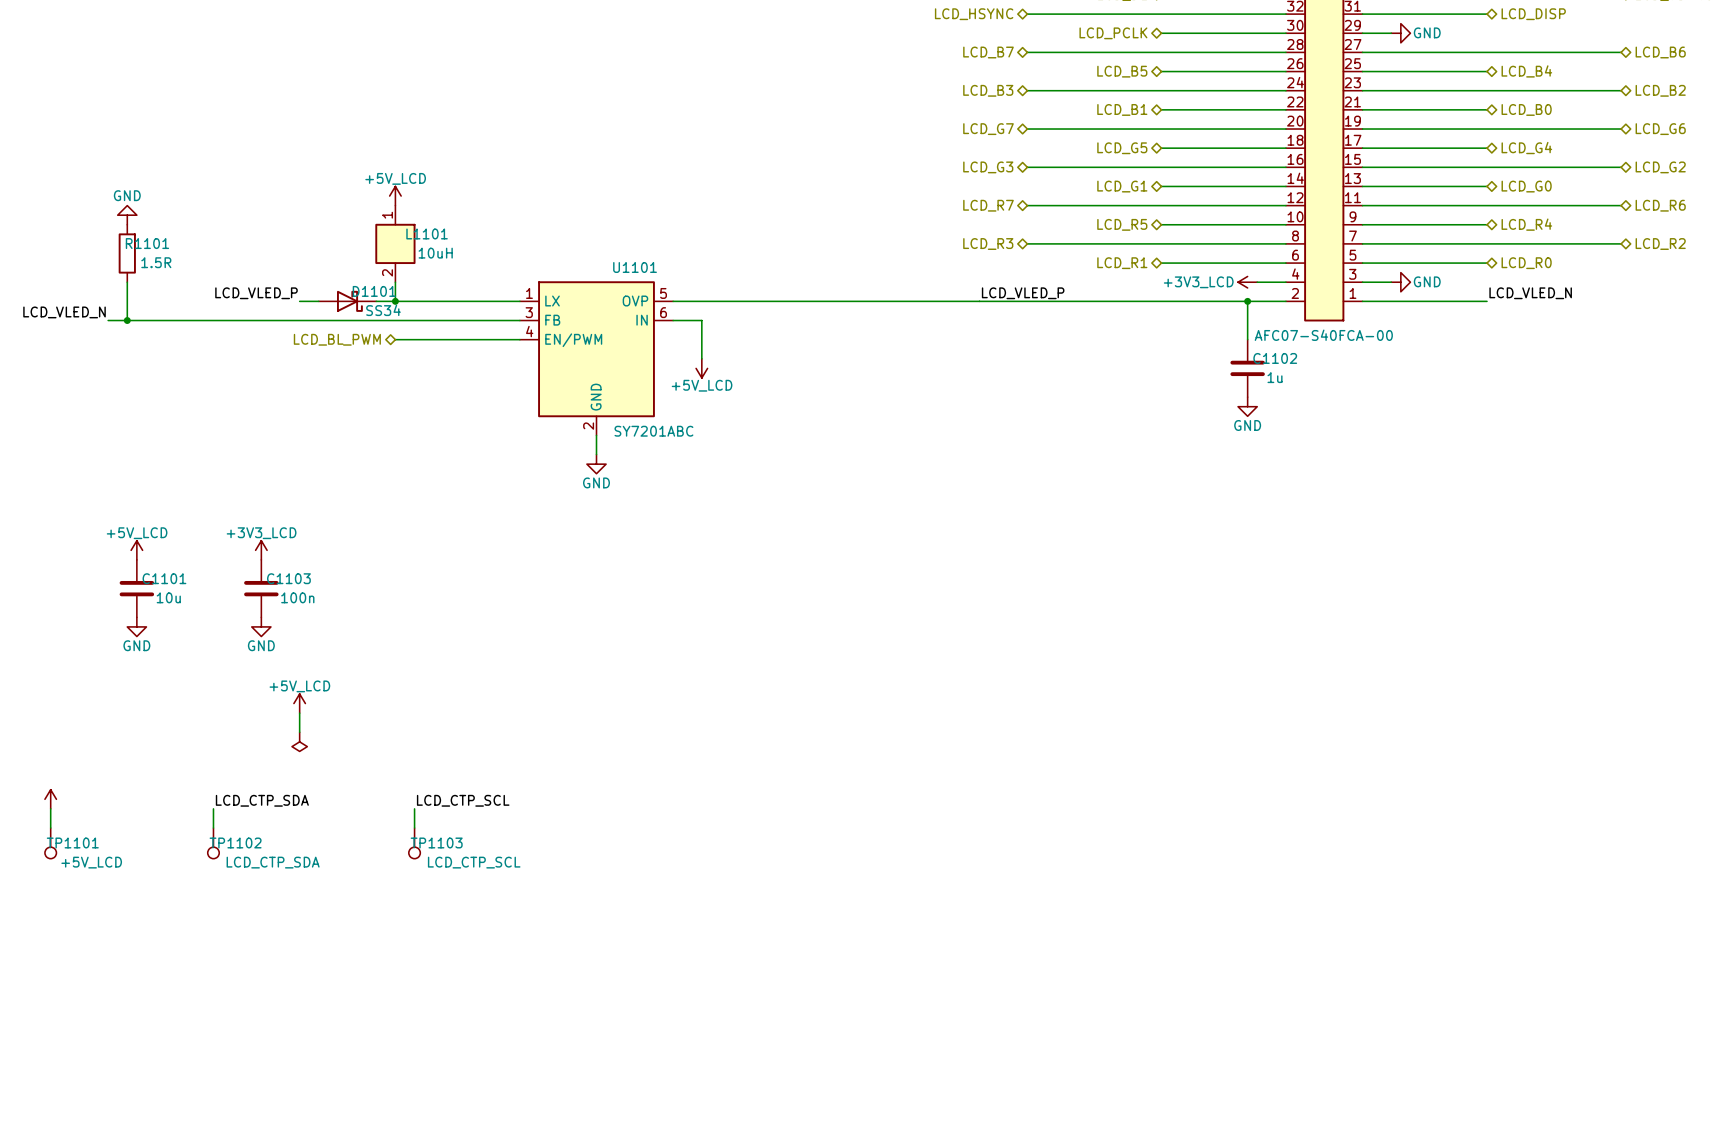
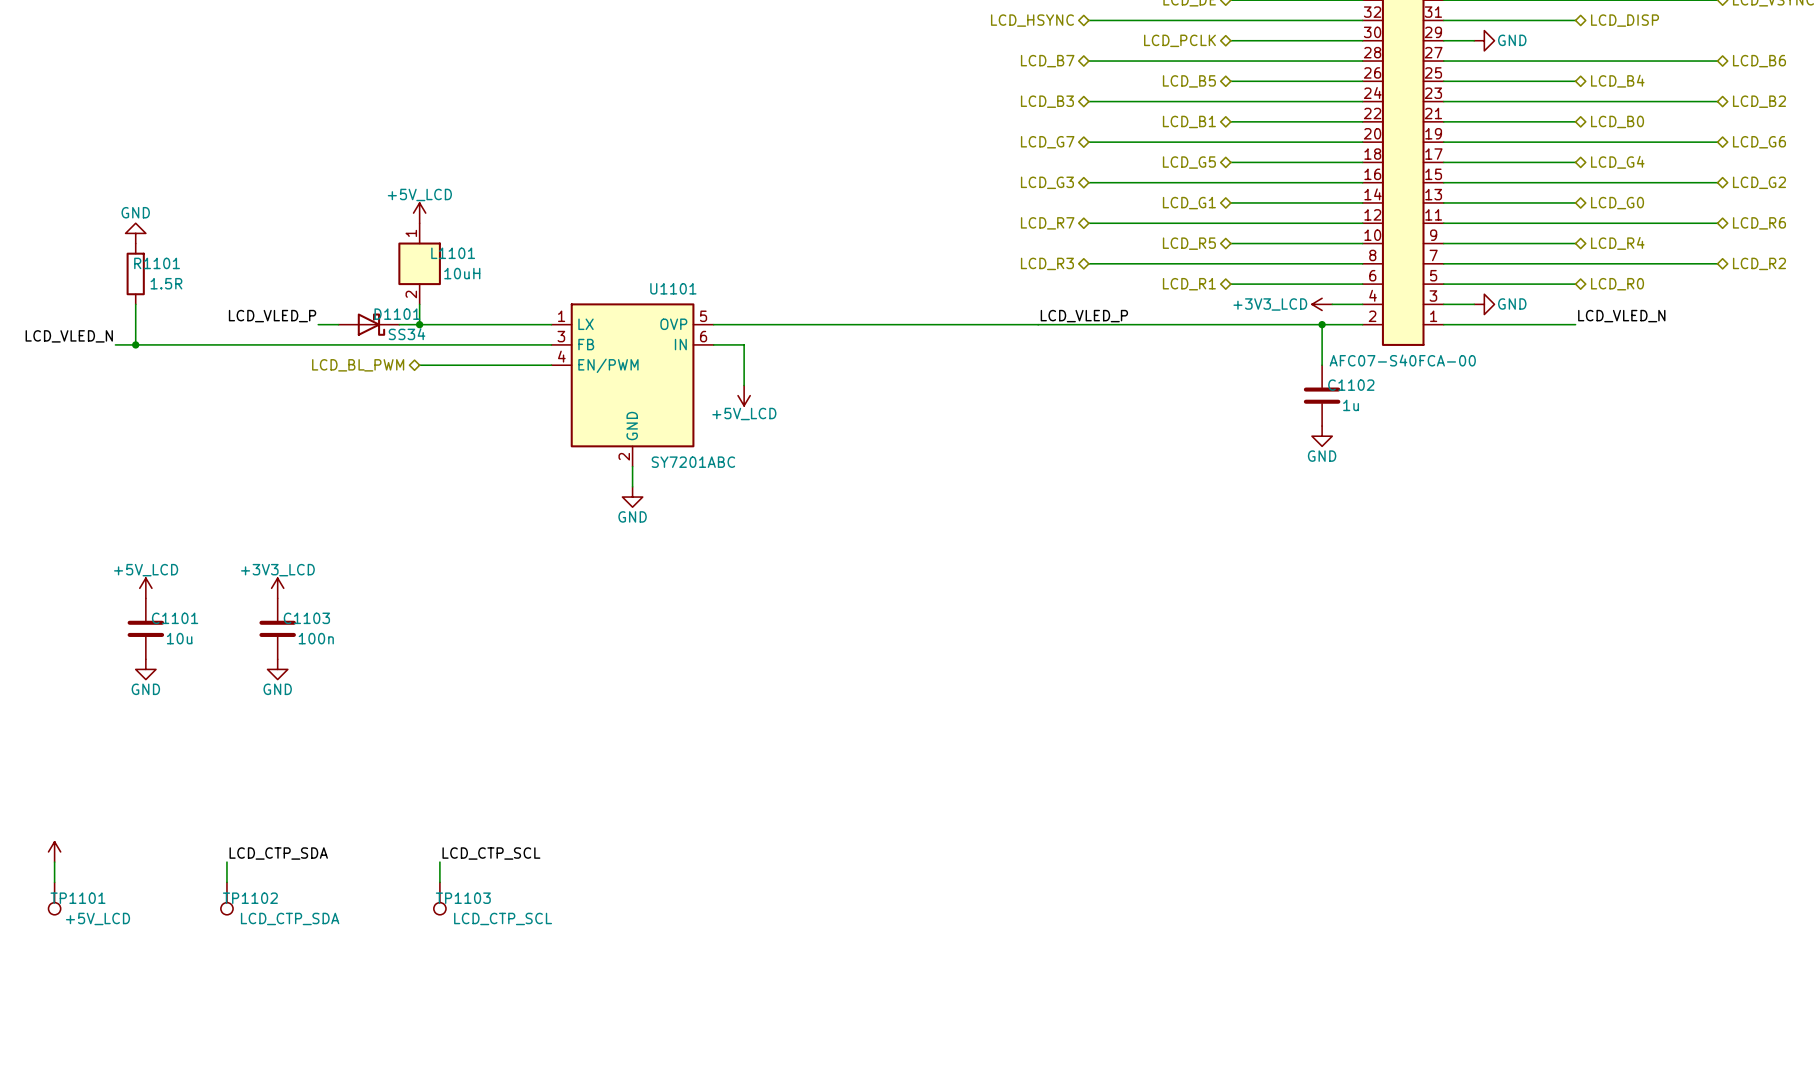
power symbol: +5V_LCD (299, 703) -> none
wire: (299, 713) (299, 732) -> none
power symbol: (299, 741) -> none

